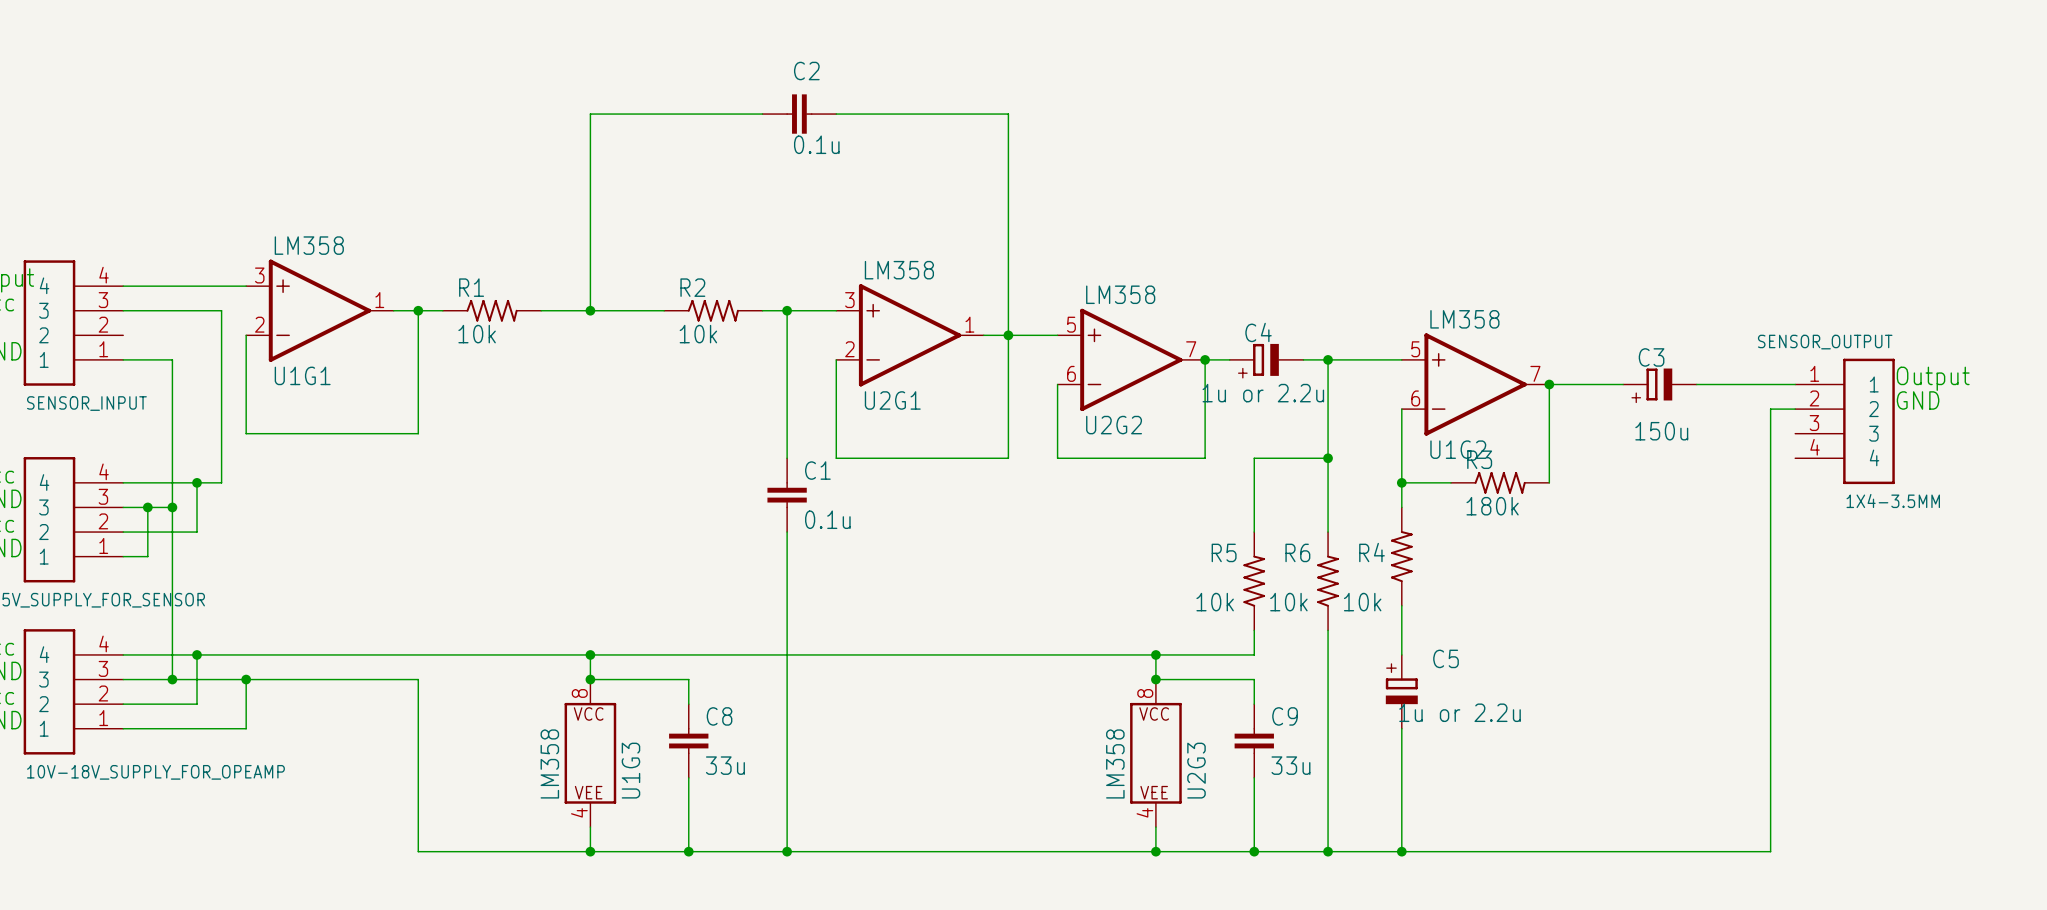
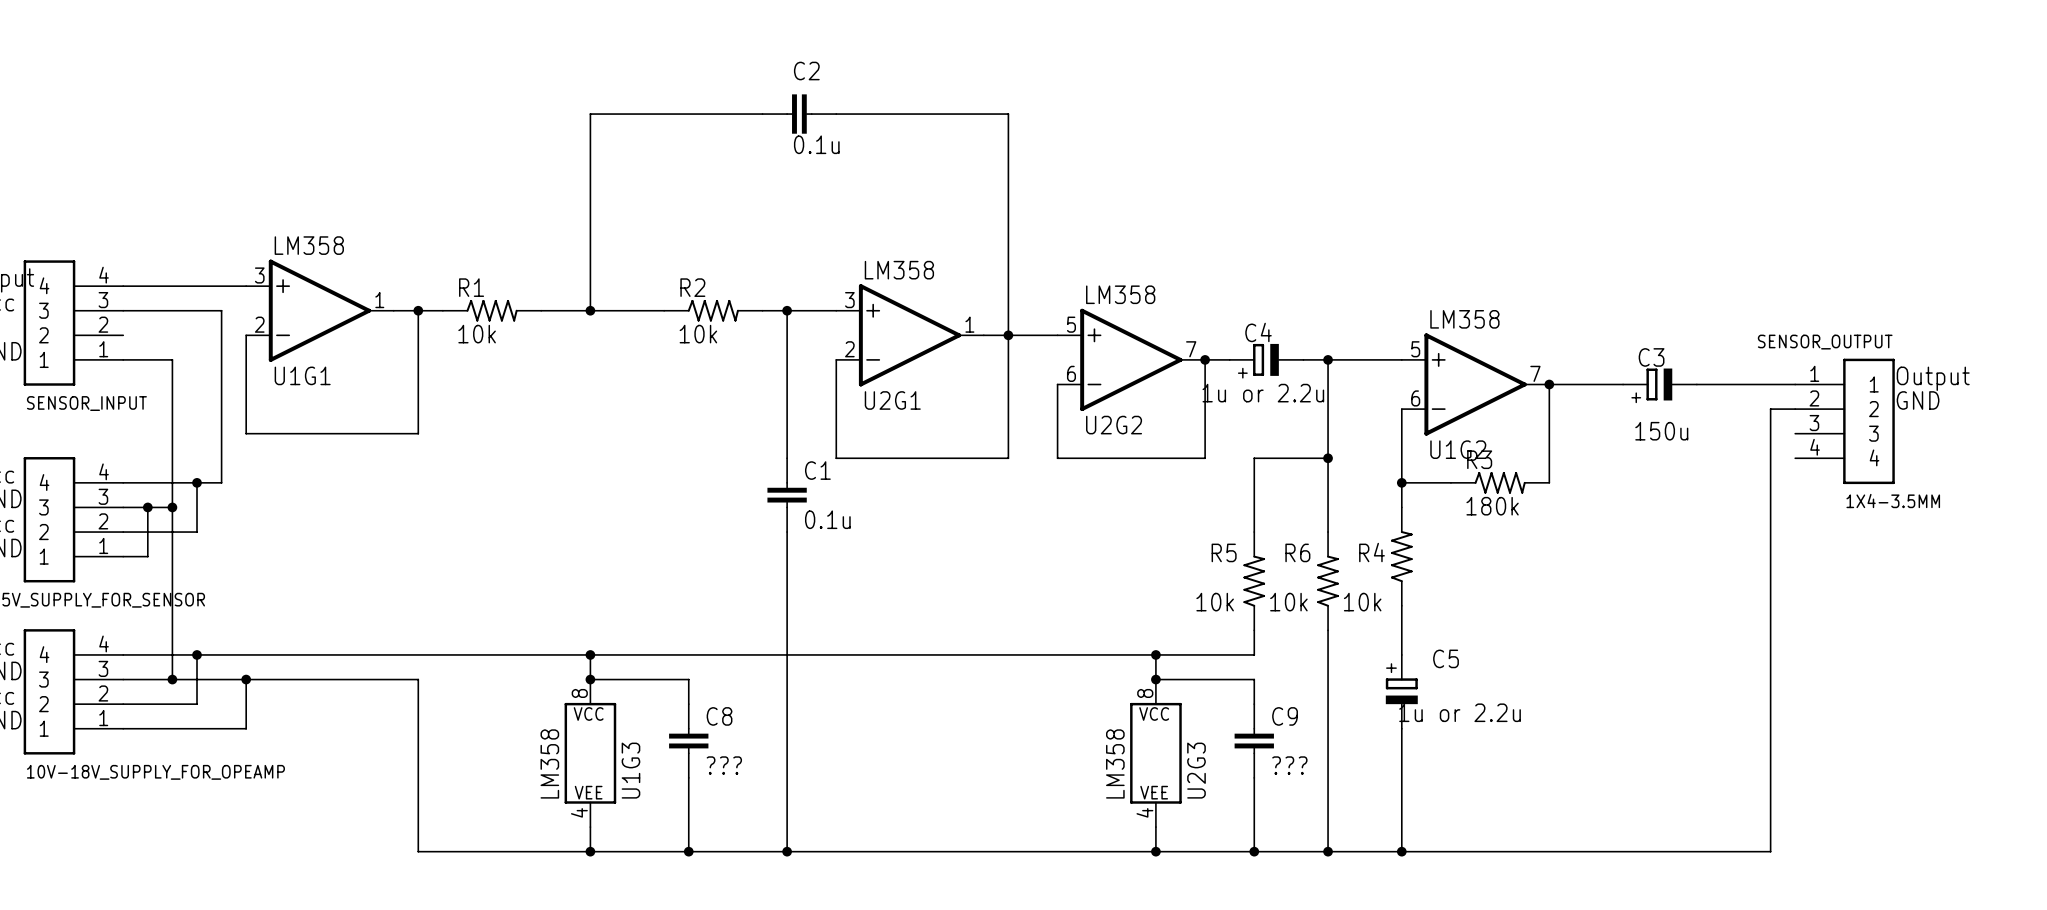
C8 value: 33u (725, 765) -> ??? (724, 765)
C9 value: 33u (1290, 765) -> ??? (1289, 765)

